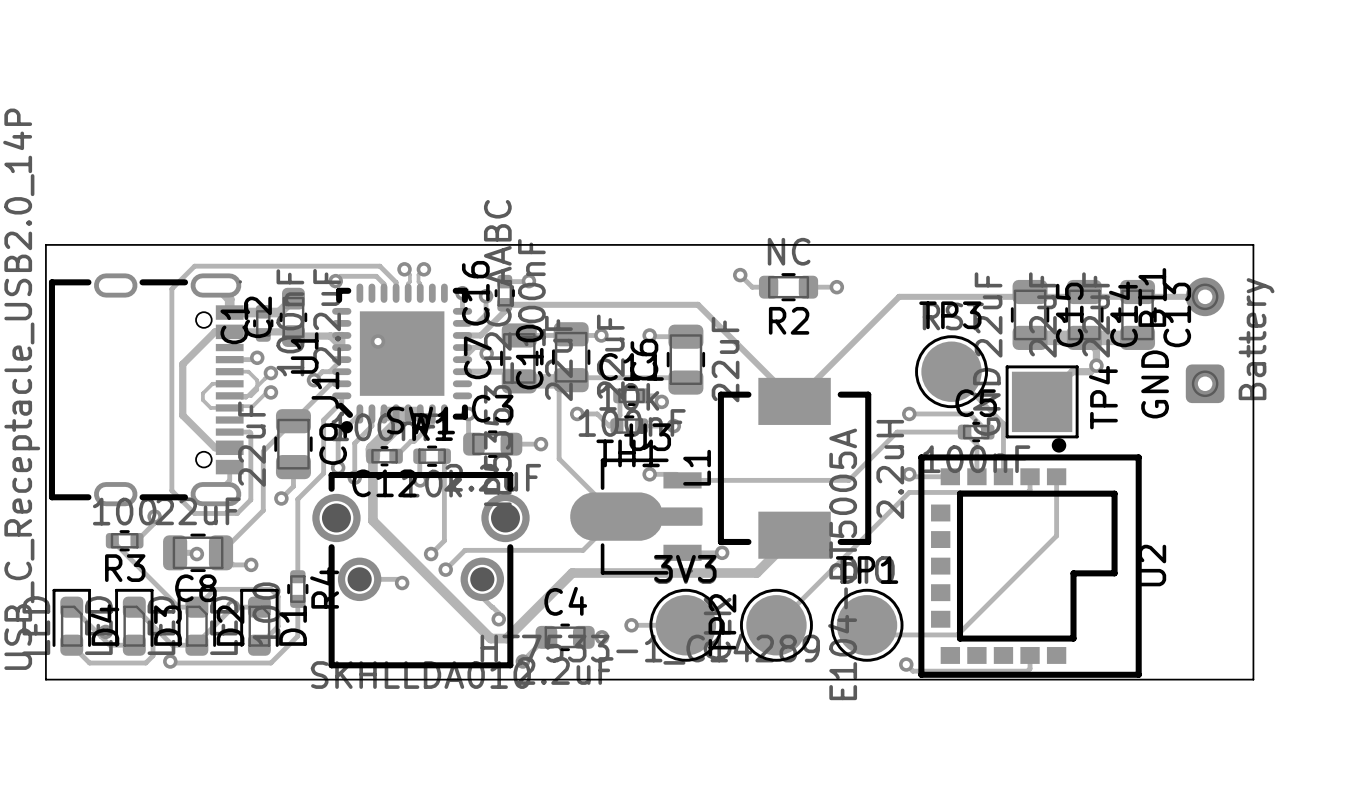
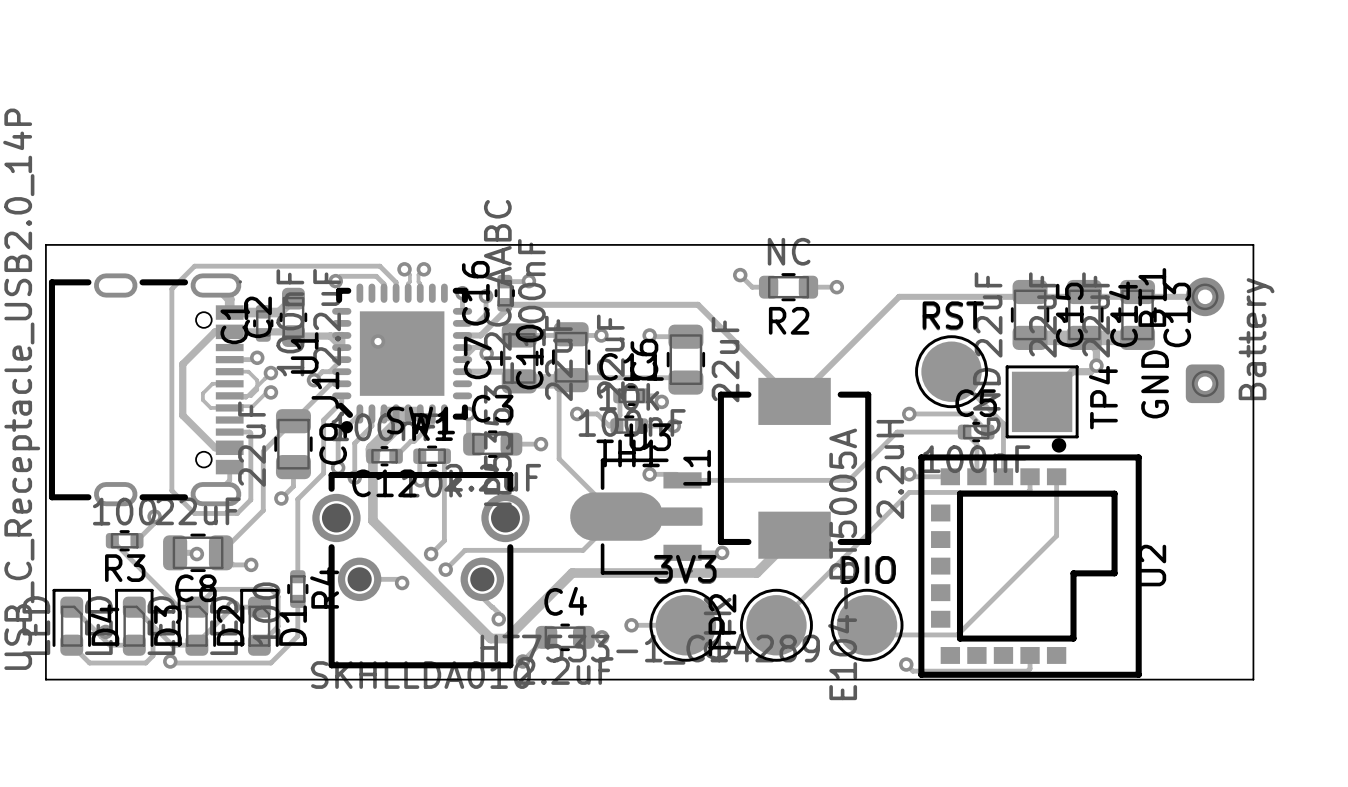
TP3 name: TP3 (950, 315) -> RST (953, 315)
TP1 name: TP1 (867, 570) -> DIO (868, 570)

